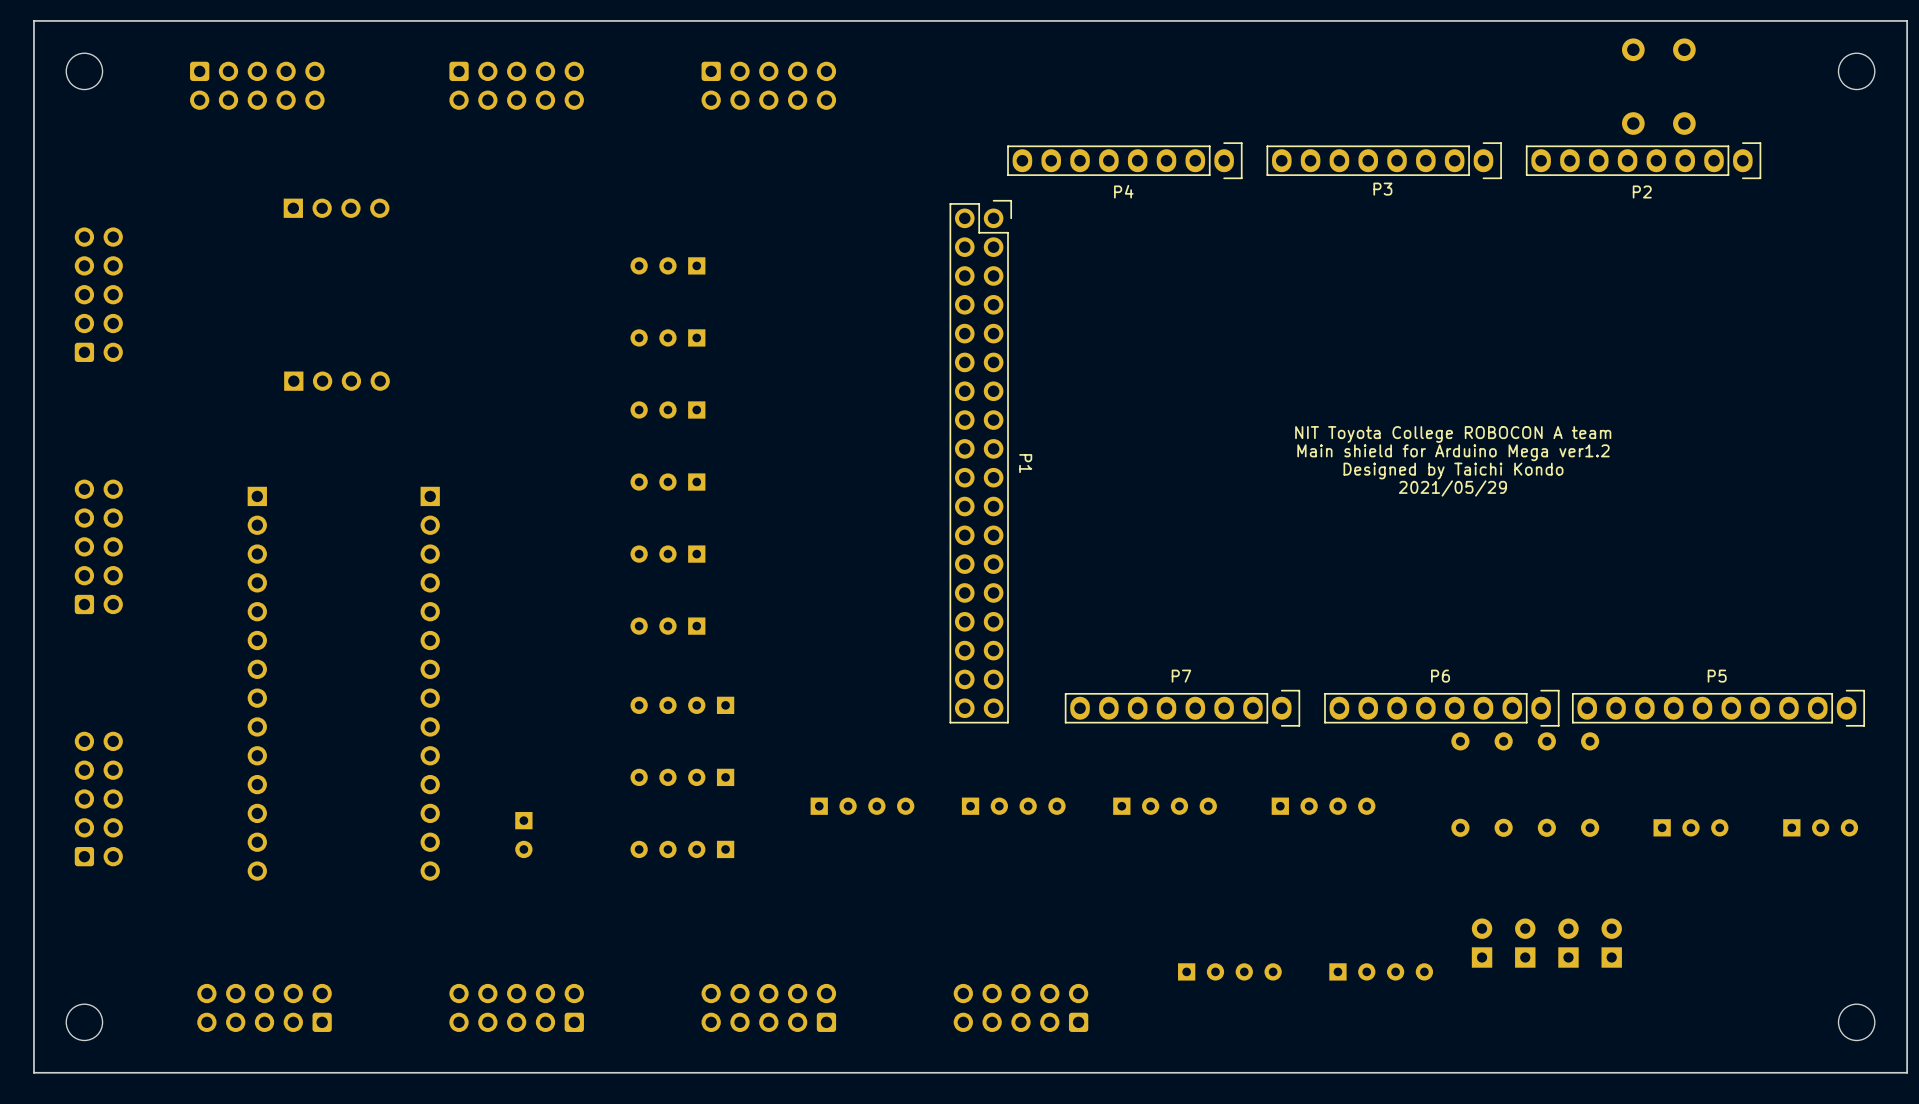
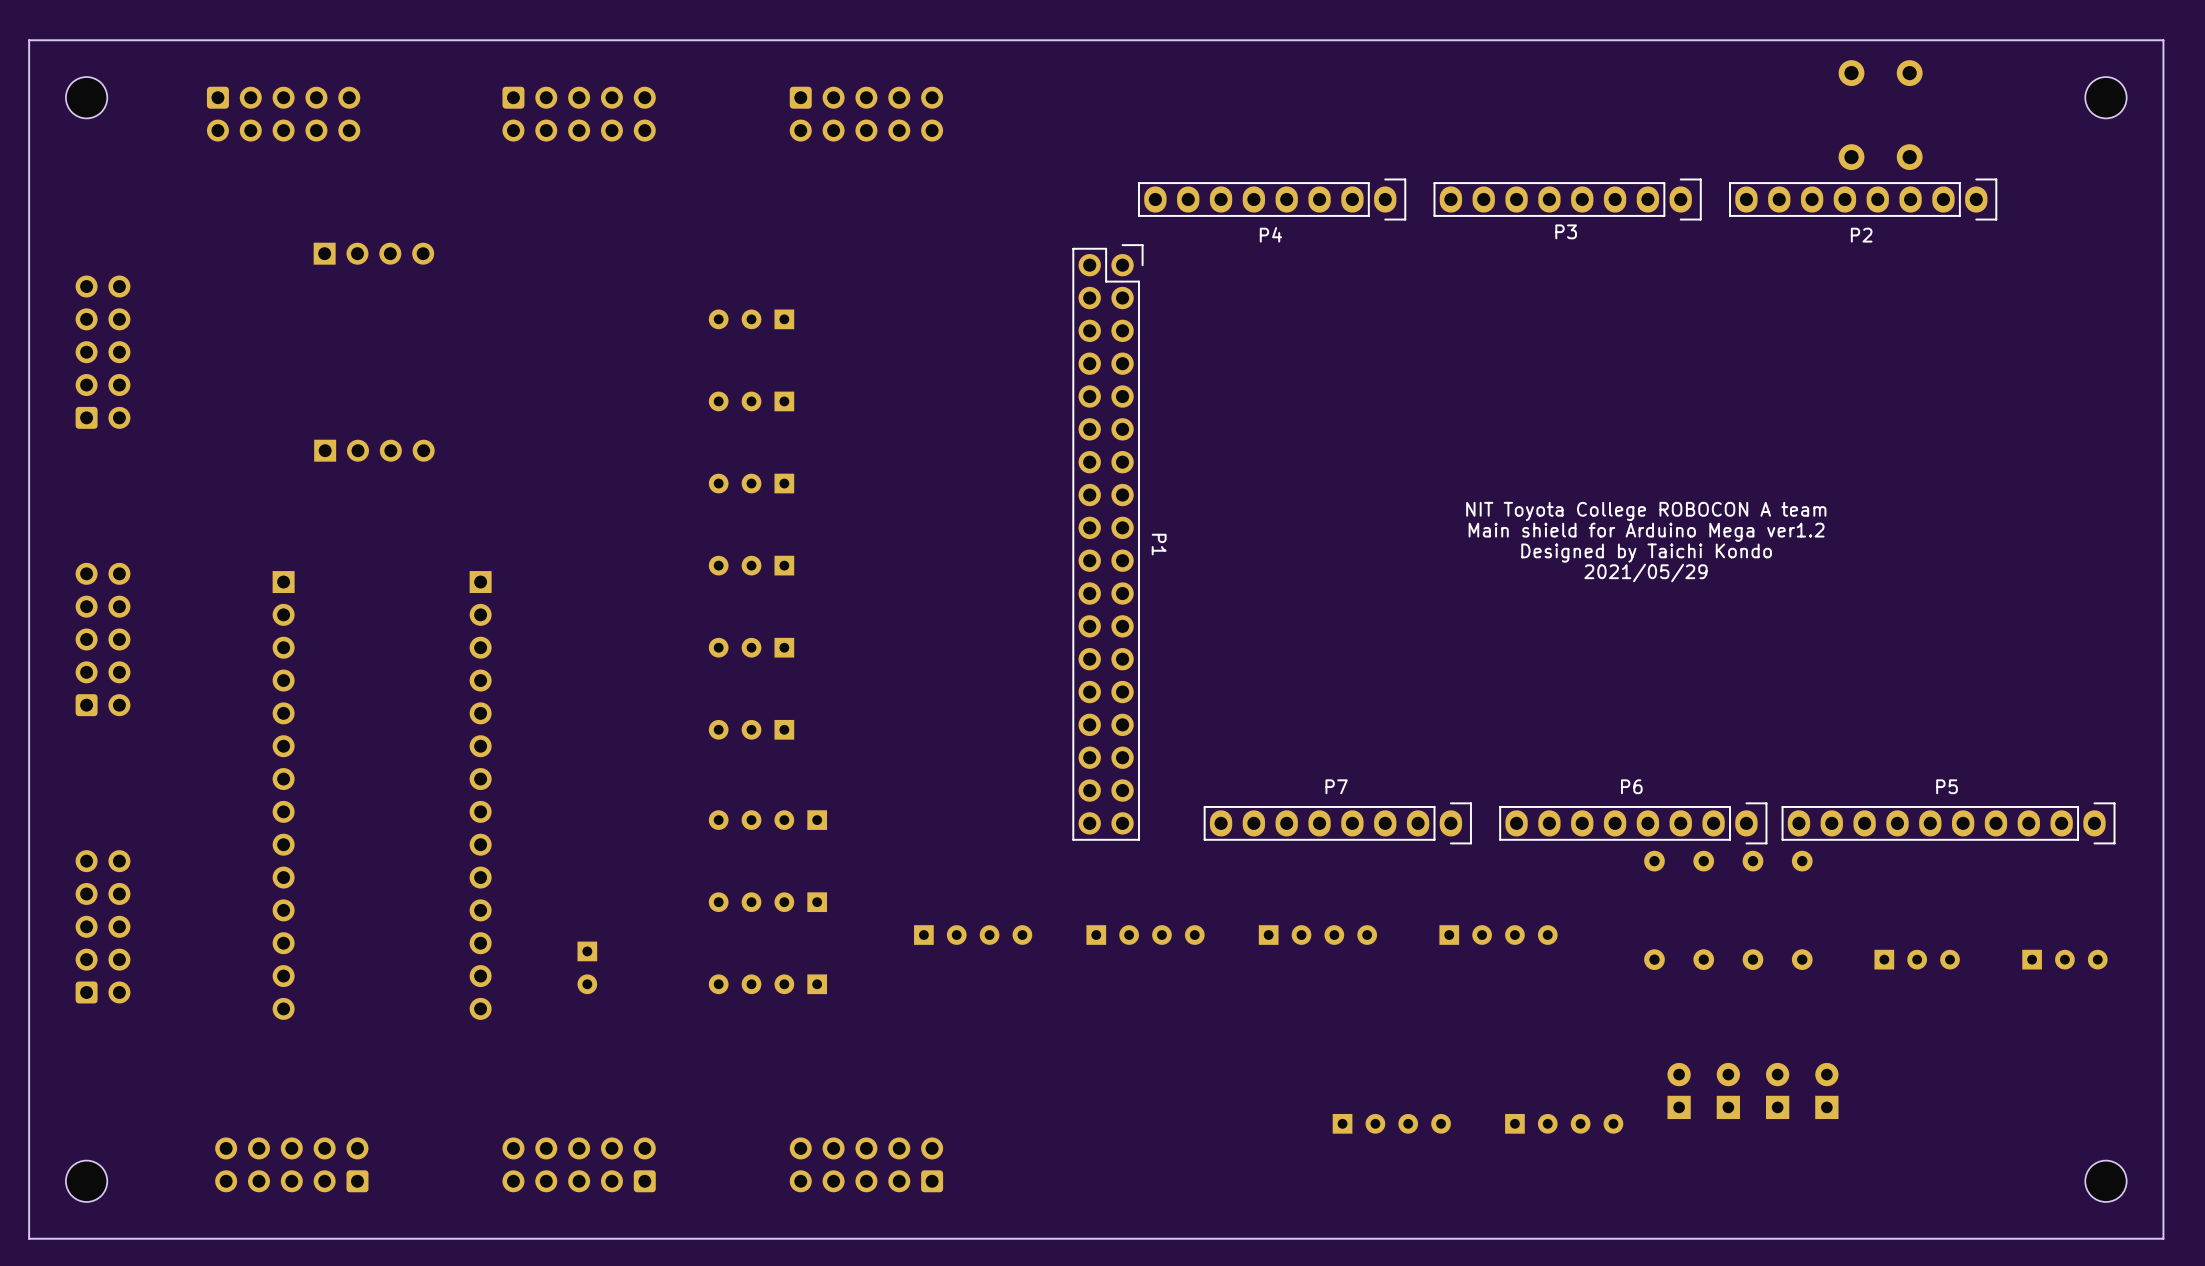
part: (1020, 1007) -> none

